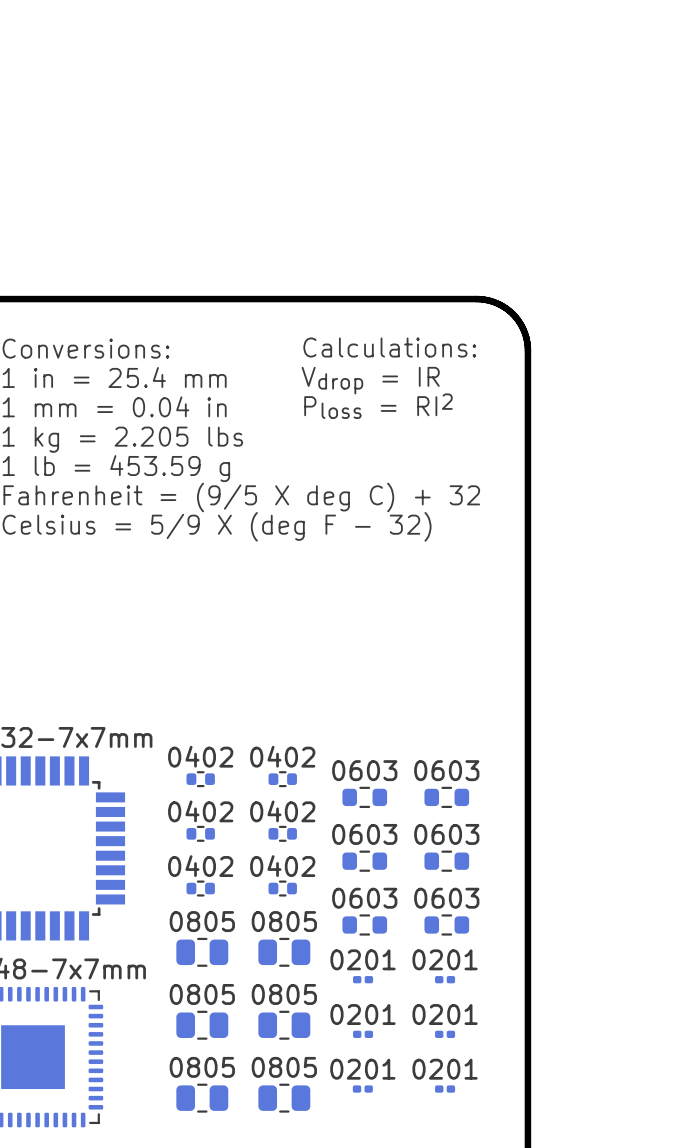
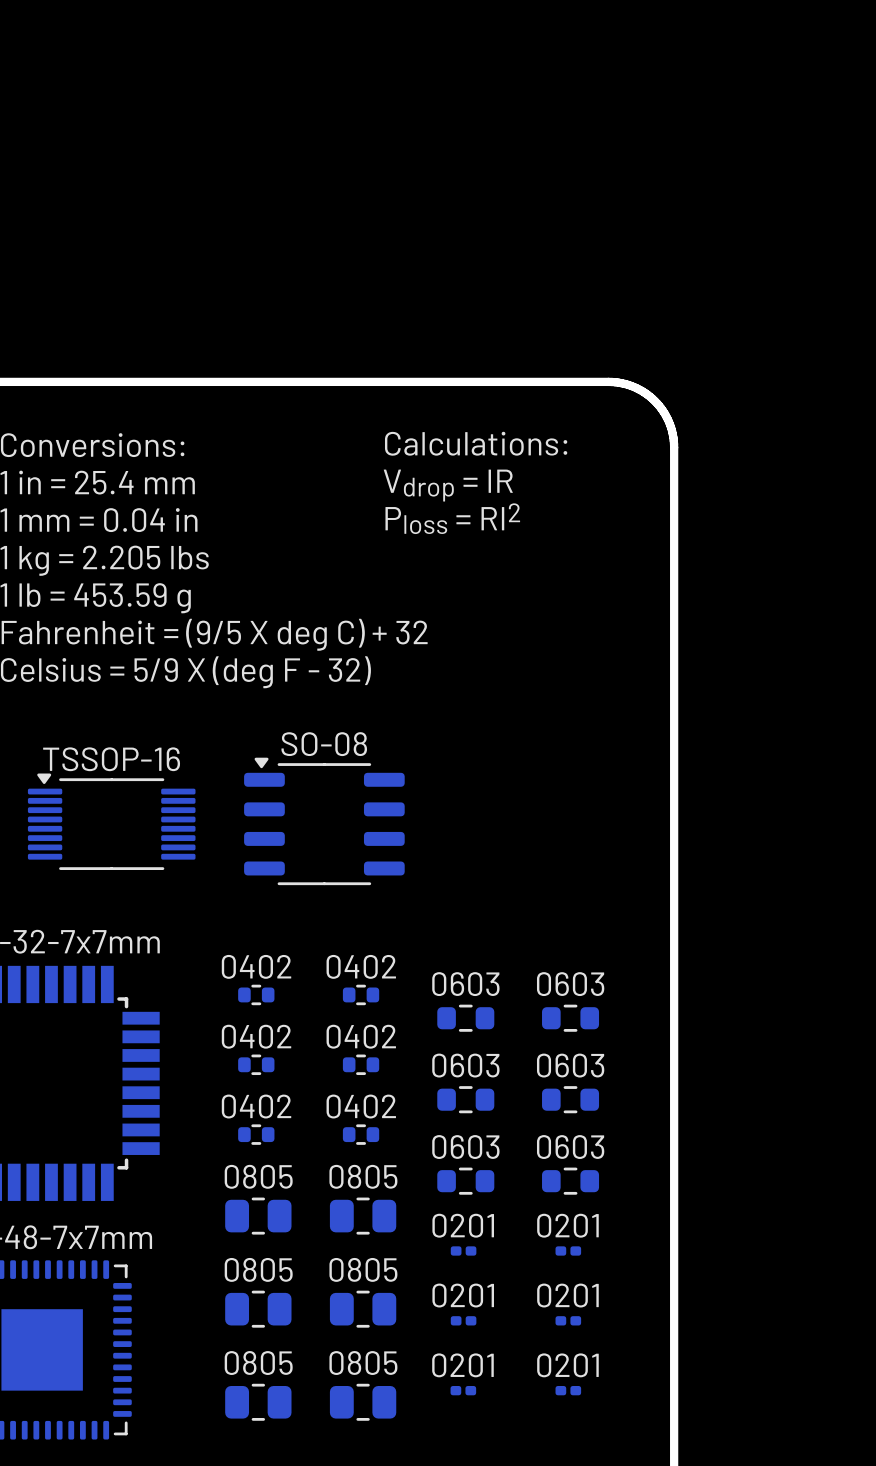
TSSOP-16: none -> (111, 821)
SO-08: none -> (324, 821)

